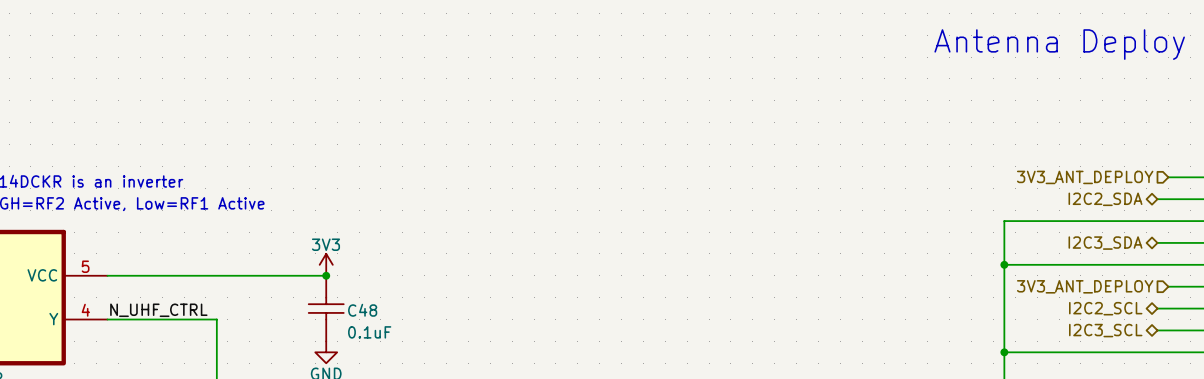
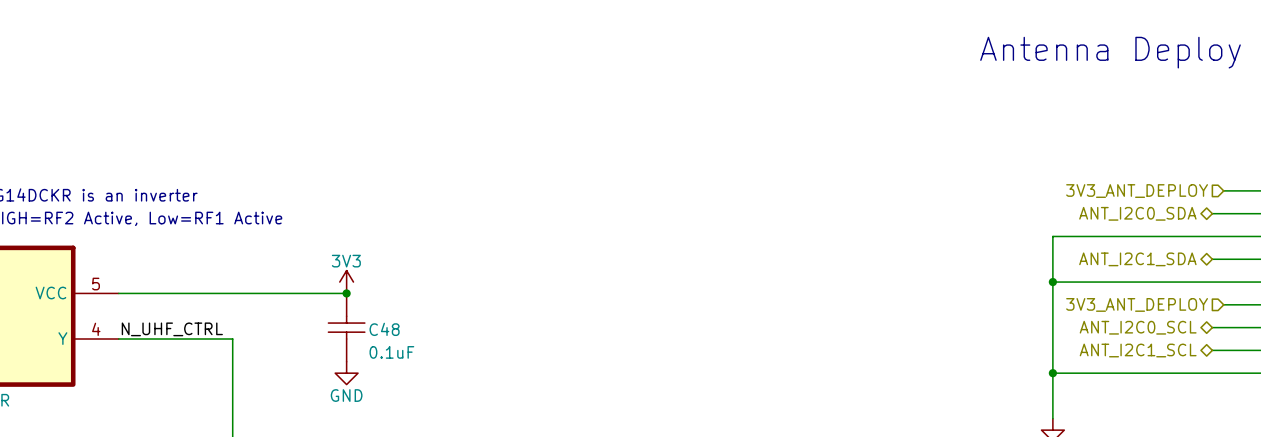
hierarchical label: I2C2_SDA (1105, 199) -> ANT_I2C0_SDA (1137, 213)
hierarchical label: I2C3_SDA (1105, 243) -> ANT_I2C1_SDA (1137, 259)
hierarchical label: I2C2_SCL (1105, 308) -> ANT_I2C0_SCL (1138, 327)
hierarchical label: I2C3_SCL (1105, 330) -> ANT_I2C1_SCL (1138, 350)

